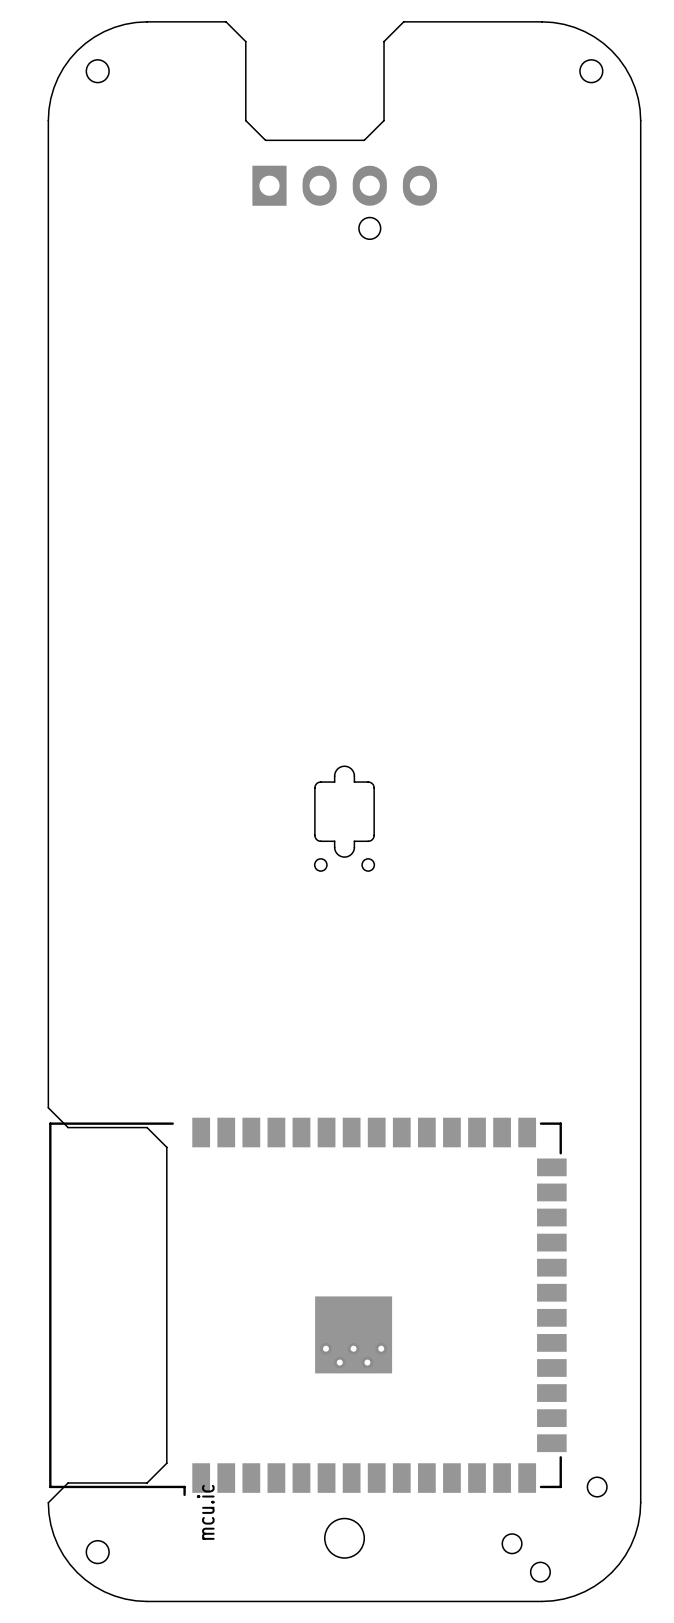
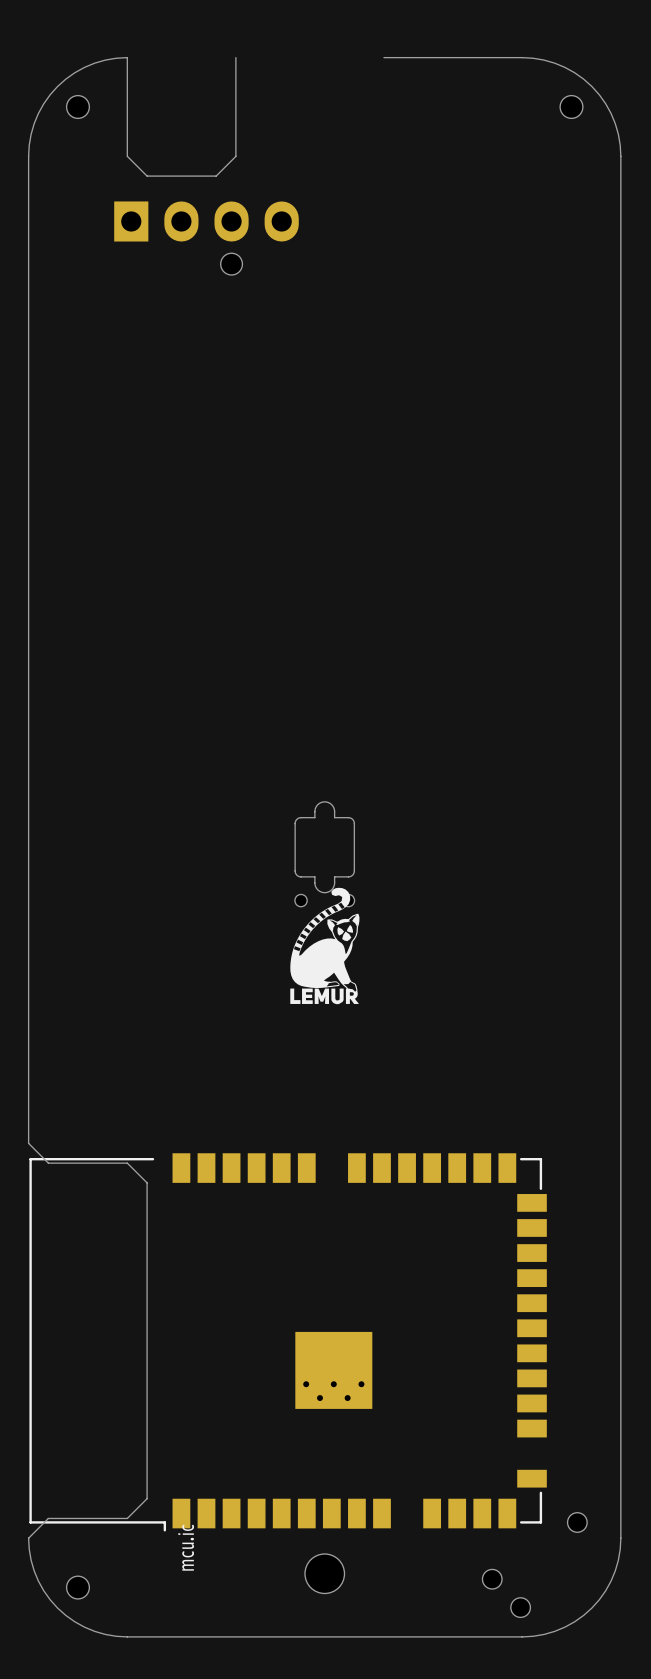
board edge: (403, 21) (384, 41) (384, 120) (364, 140) (265, 140) (245, 120) (245, 41) (226, 21) (147, 21) -> (235, 57) (235, 156) (216, 176) (147, 176) (127, 156) (127, 57)
part position: (344, 202) -> (206, 238)
drawing: none -> [290, 887, 360, 1005]
mcu.ic footprint: [49, 1117, 567, 1497] -> [29, 1153, 547, 1532]

